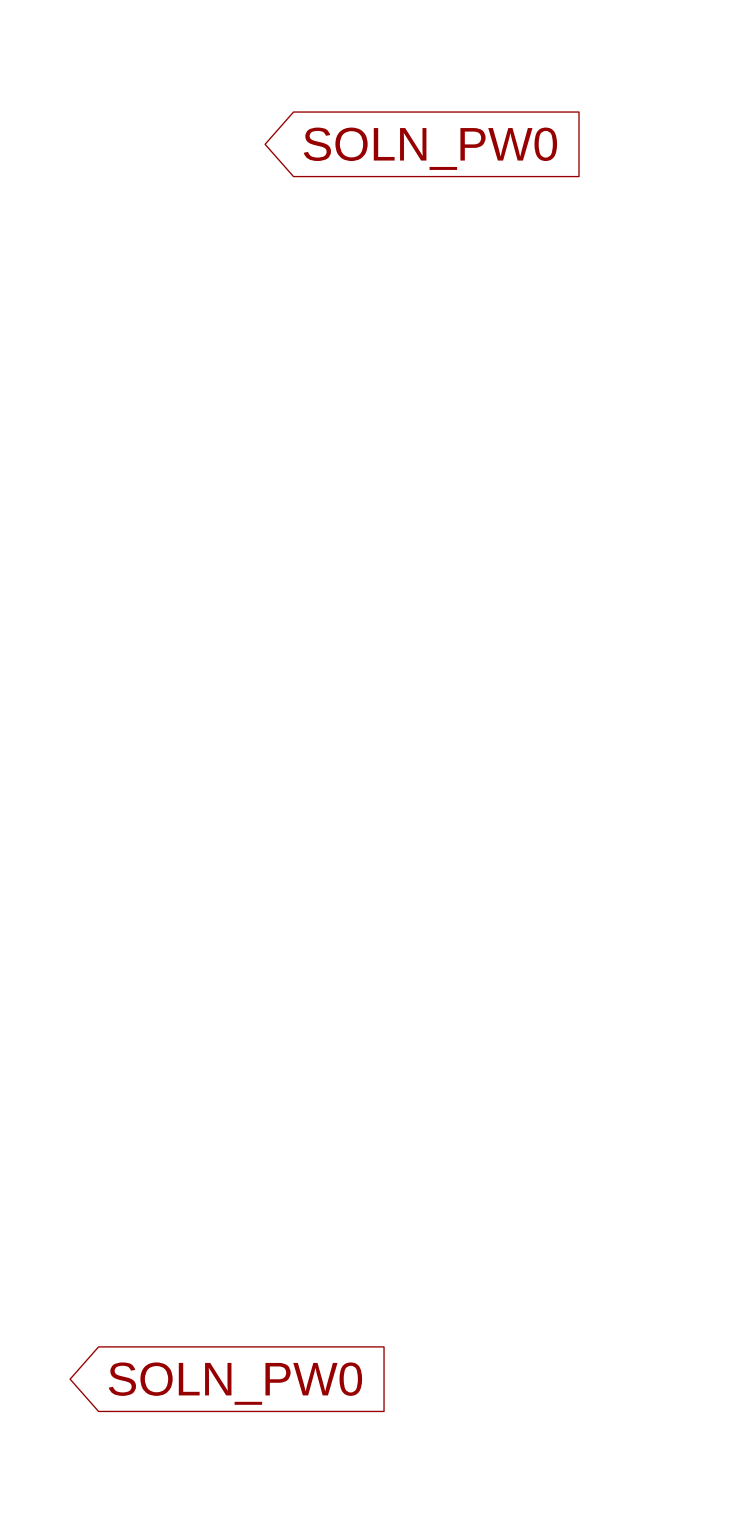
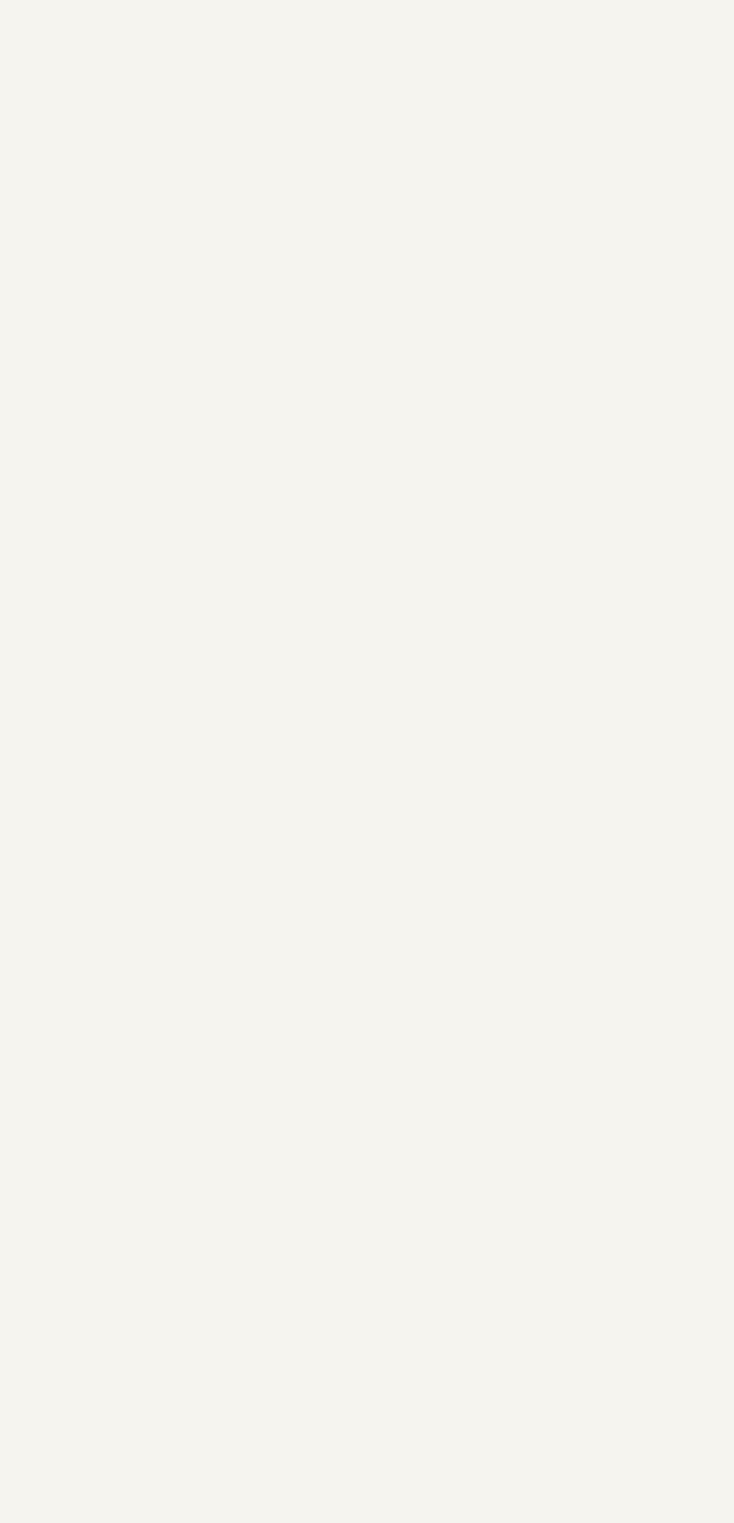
global label: SOLN_PW0 (430, 148) -> none
global label: SOLN_PW0 (235, 1383) -> none

